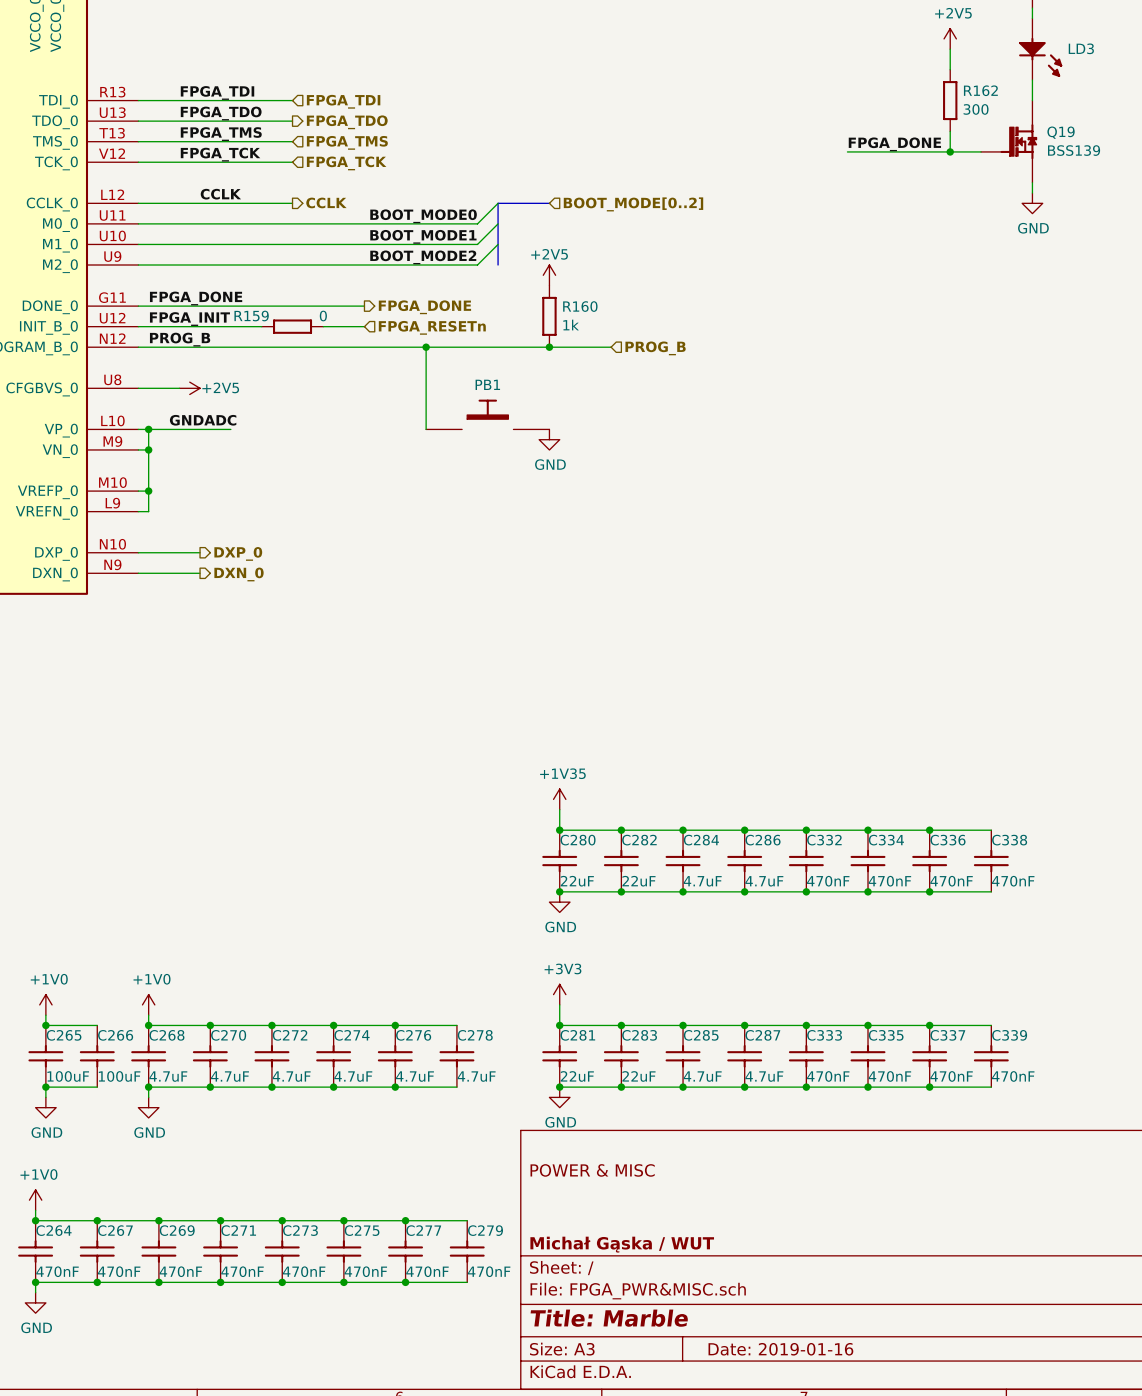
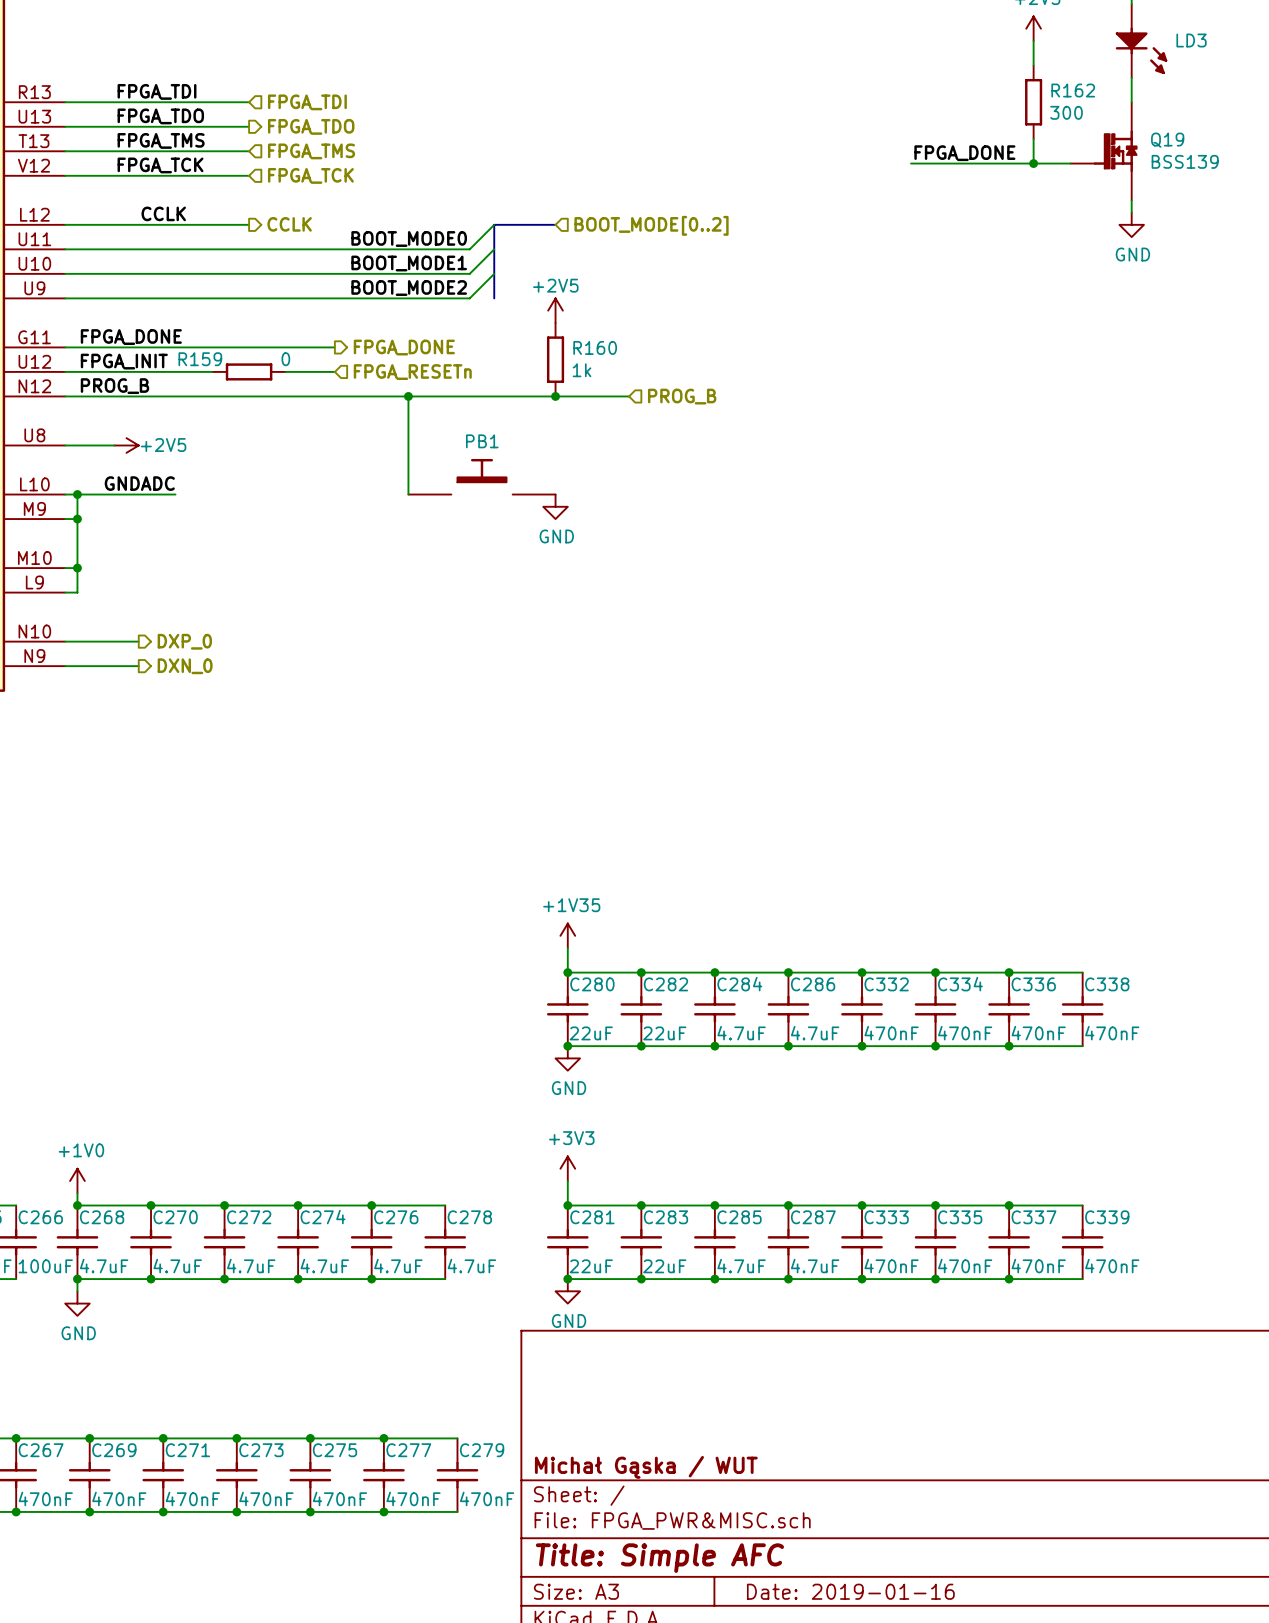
title block: POWER & MISC (592, 1170) -> none
title block: Title: Marble (609, 1318) -> Title: Simple AFC (659, 1558)

